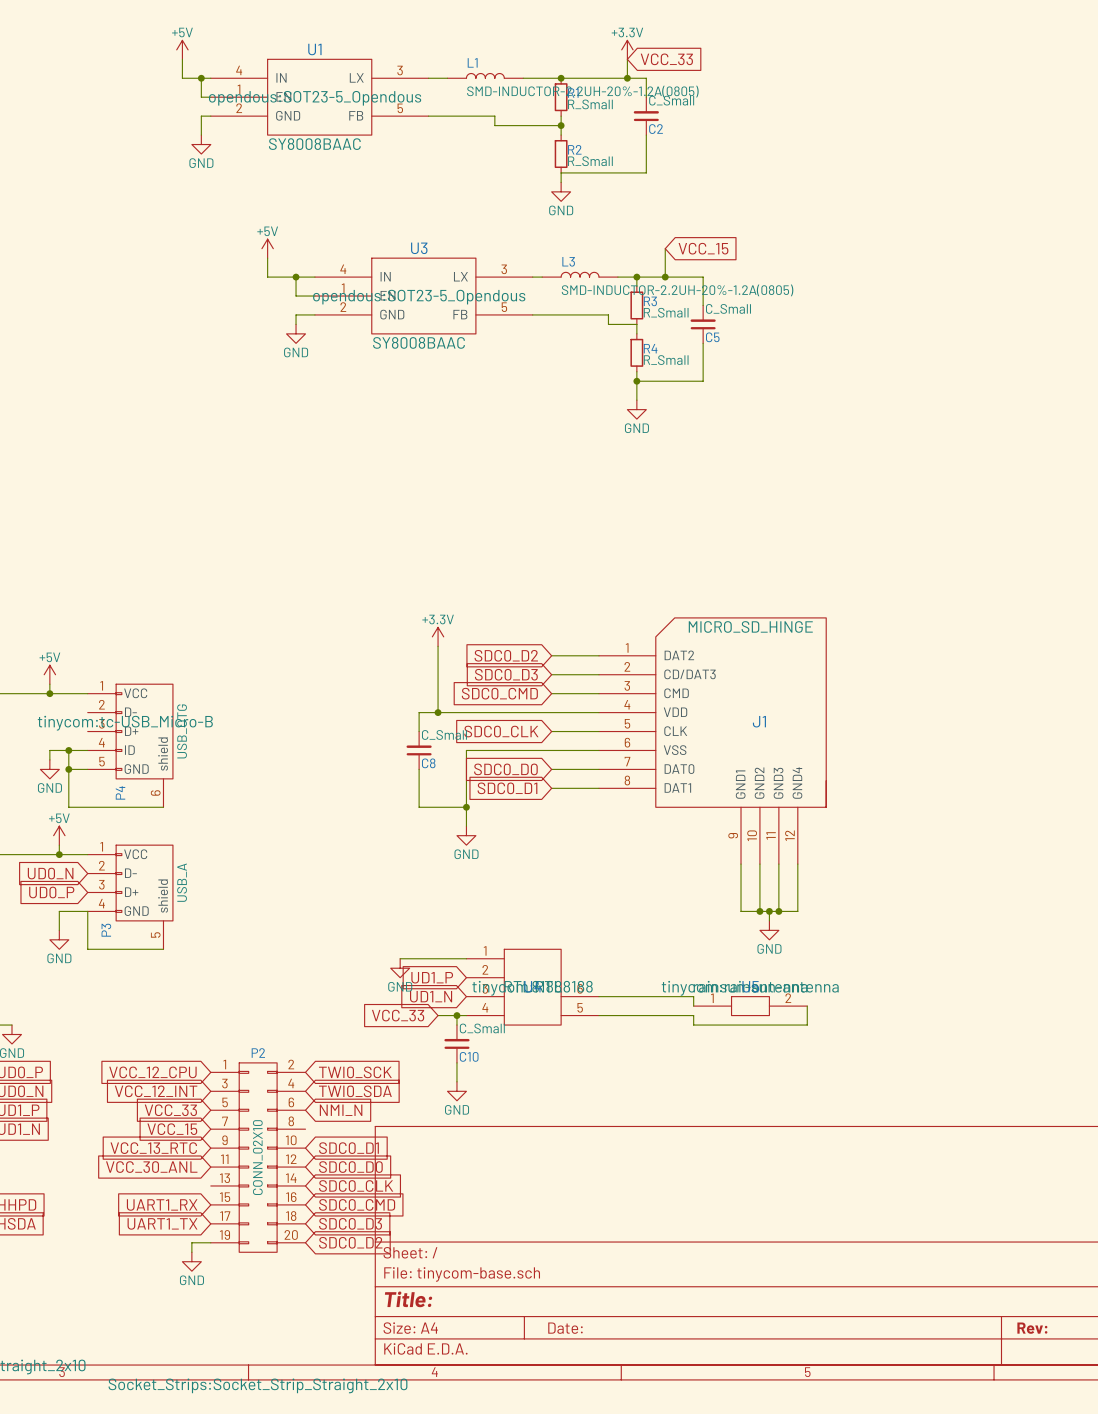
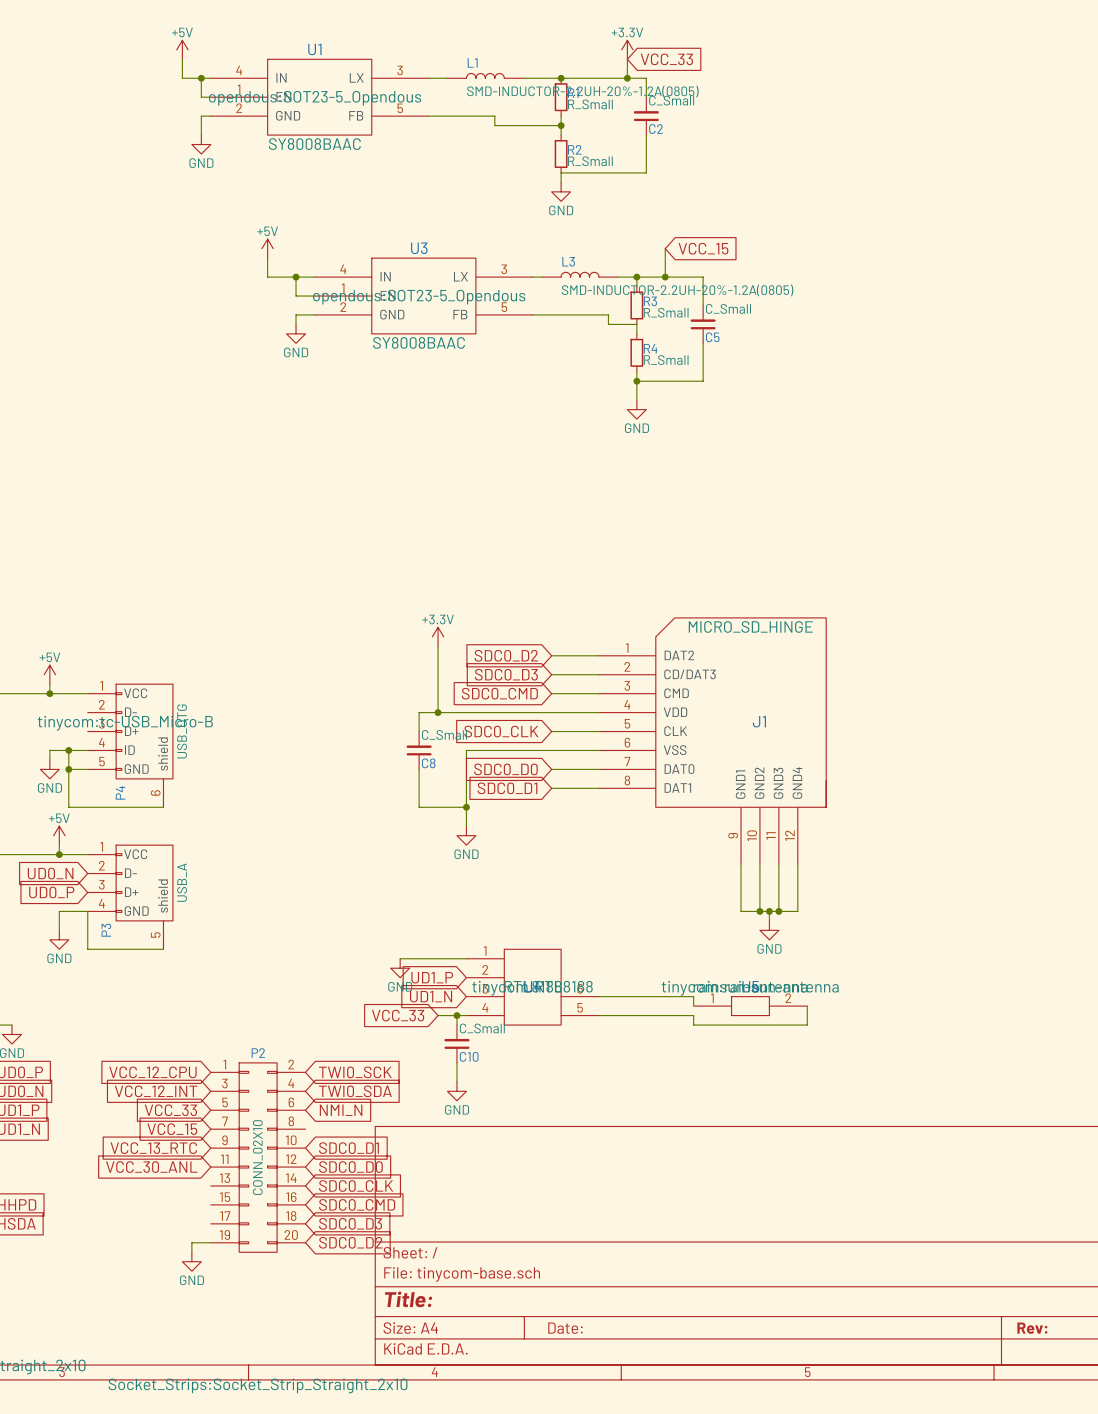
global label: UART1_RX (162, 1204) -> none
global label: UART1_TX (162, 1223) -> none

